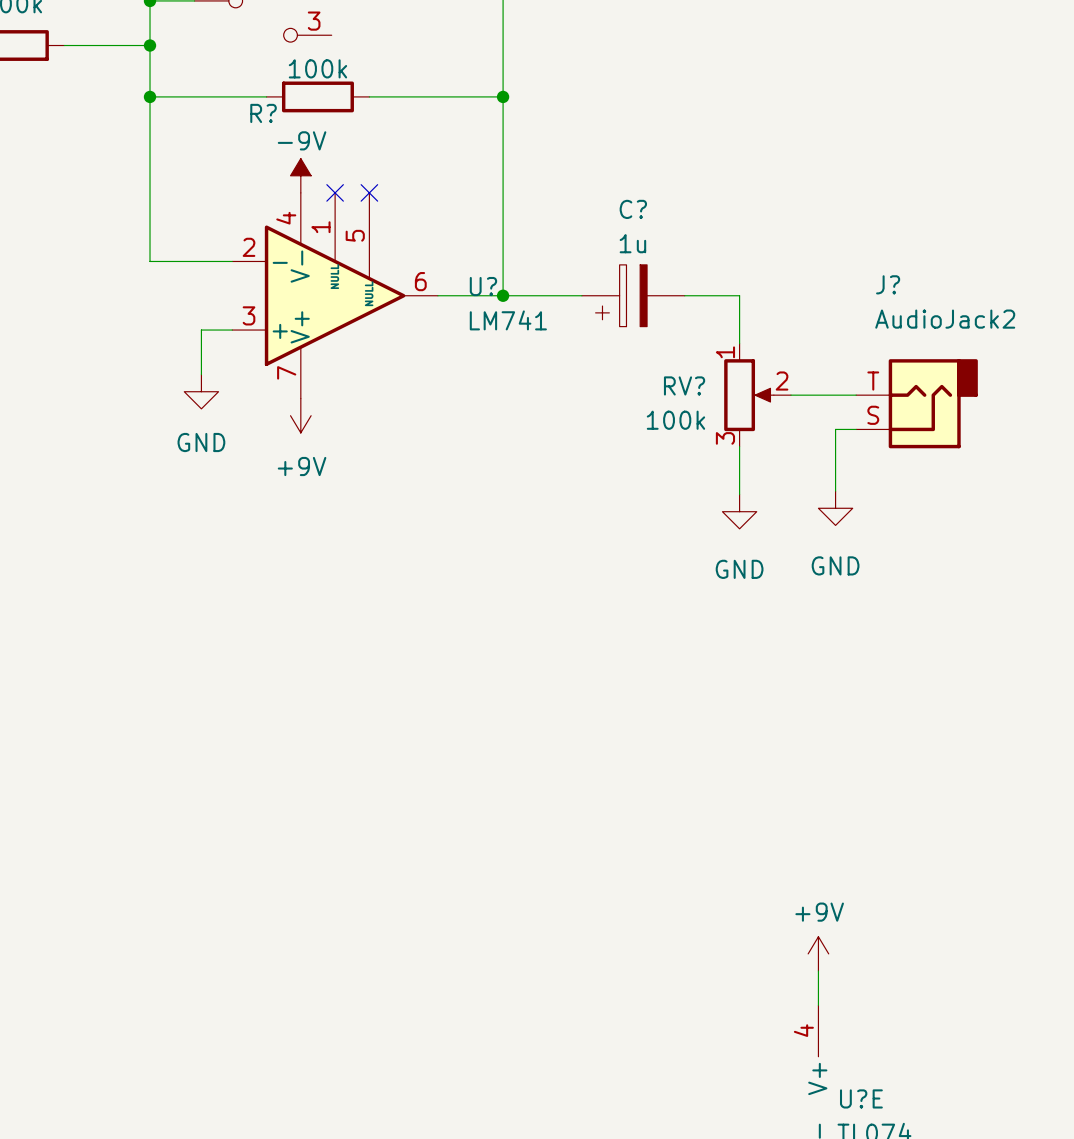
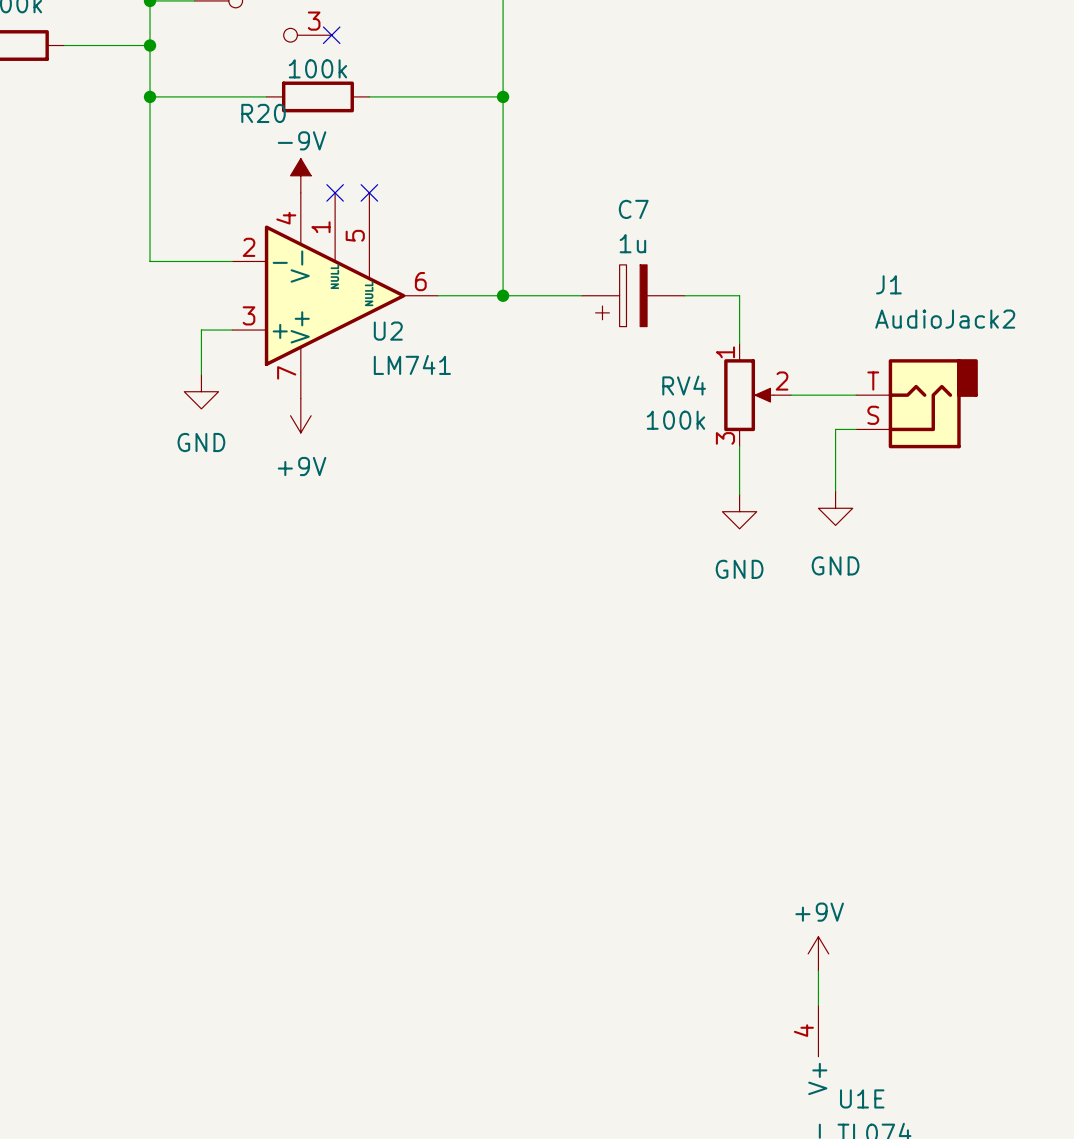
no-connect mark: none -> (331, 35)
R? name: R? (263, 113) -> R20 (263, 113)
C? name: C? (633, 209) -> C7 (633, 209)
J? name: J? (888, 284) -> J1 (888, 284)
U? name: U? (483, 286) -> U2 (388, 331)
U? value position: LM741 (508, 320) -> LM741 (412, 364)
RV? name: RV? (684, 385) -> RV4 (684, 385)
U?E name: U?E (861, 1098) -> U1E (862, 1098)

